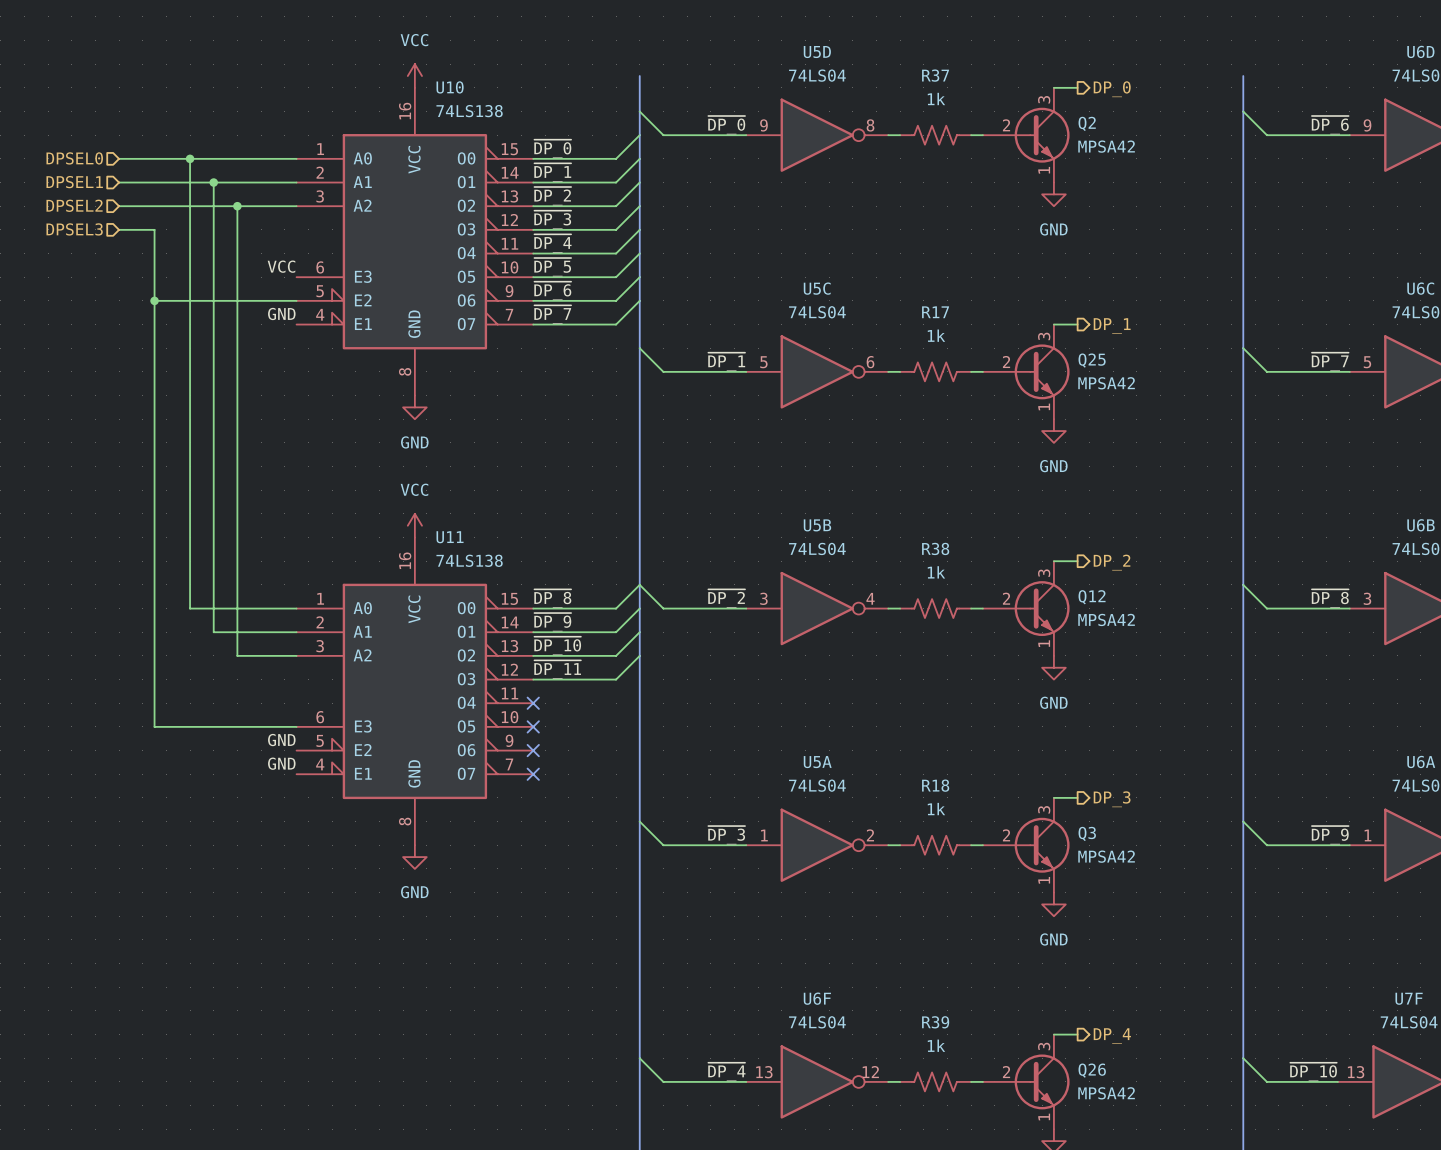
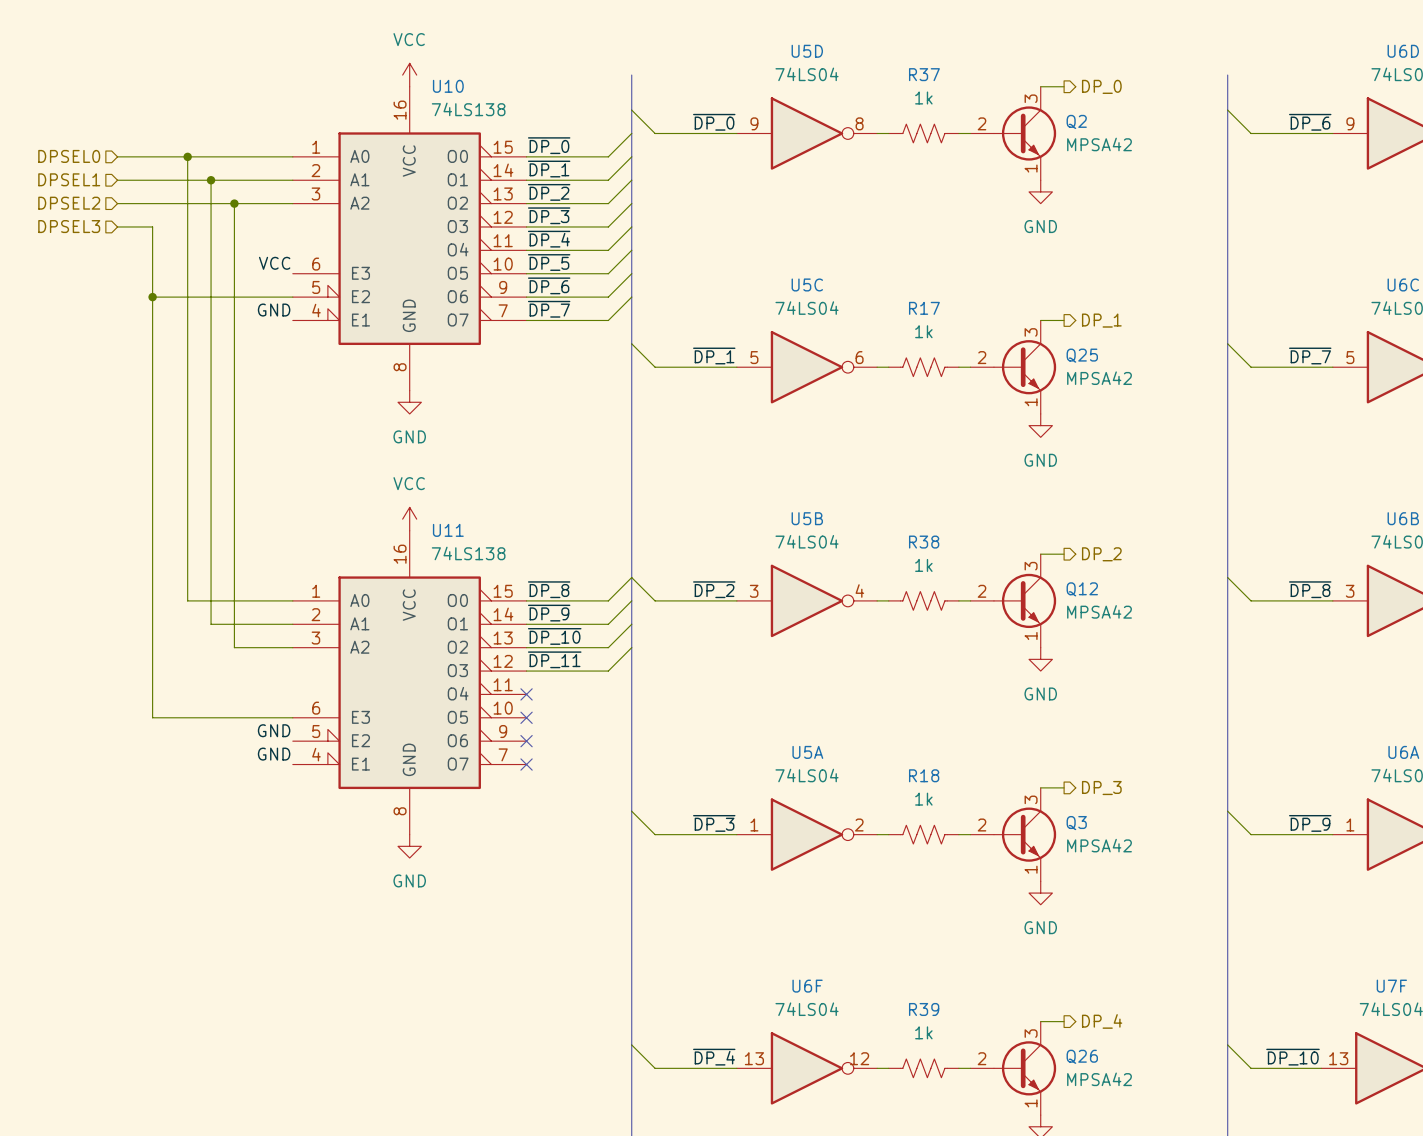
Q2 symbol: [982, 87, 1070, 183] -> [970, 86, 1057, 181]
Q25 symbol: [982, 324, 1070, 420] -> [970, 320, 1057, 414]
Q12 symbol: [982, 561, 1070, 656] -> [970, 554, 1057, 648]
Q3 symbol: [982, 797, 1070, 893] -> [970, 787, 1057, 882]
Q26 symbol: [982, 1034, 1070, 1130] -> [970, 1021, 1057, 1116]

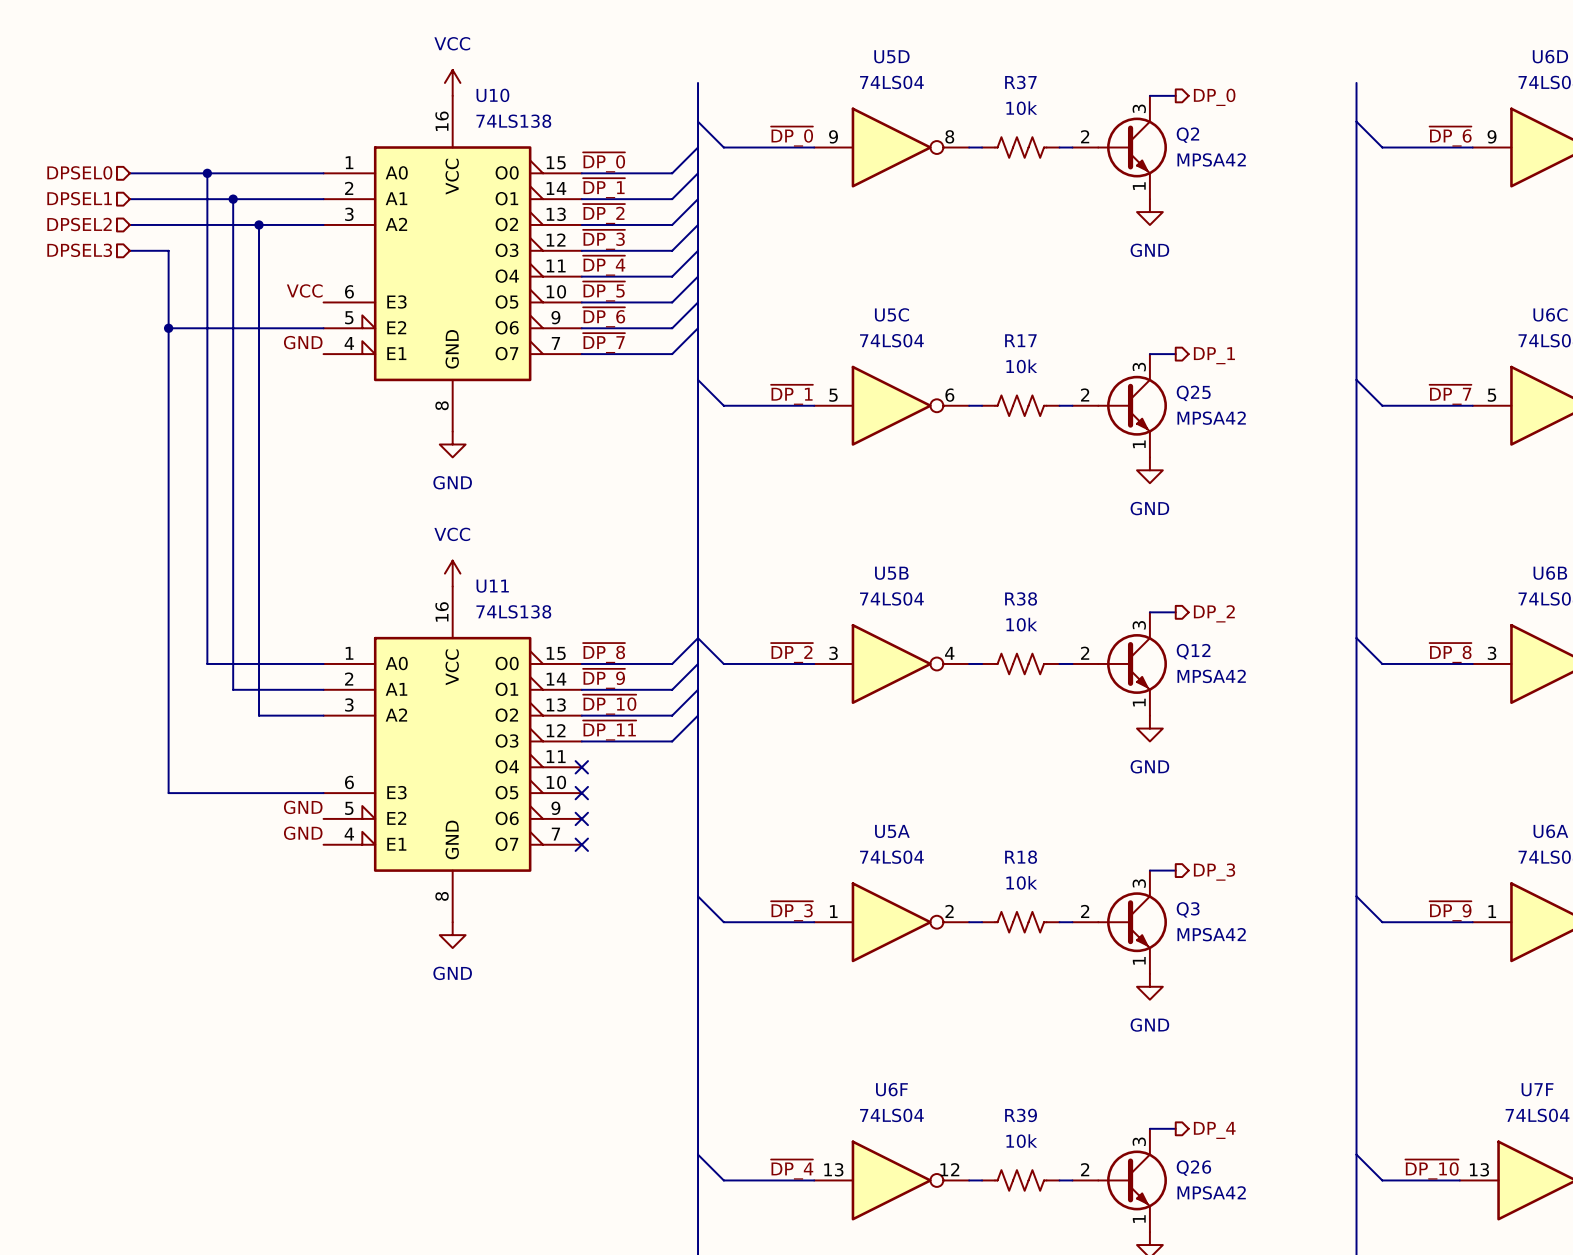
R37 value: 1k (923, 98) -> 10k (1021, 108)
R17 value: 1k (923, 331) -> 10k (1021, 366)
R38 value: 1k (923, 565) -> 10k (1021, 624)
R18 value: 1k (923, 799) -> 10k (1021, 882)
R39 value: 1k (923, 1032) -> 10k (1021, 1141)

